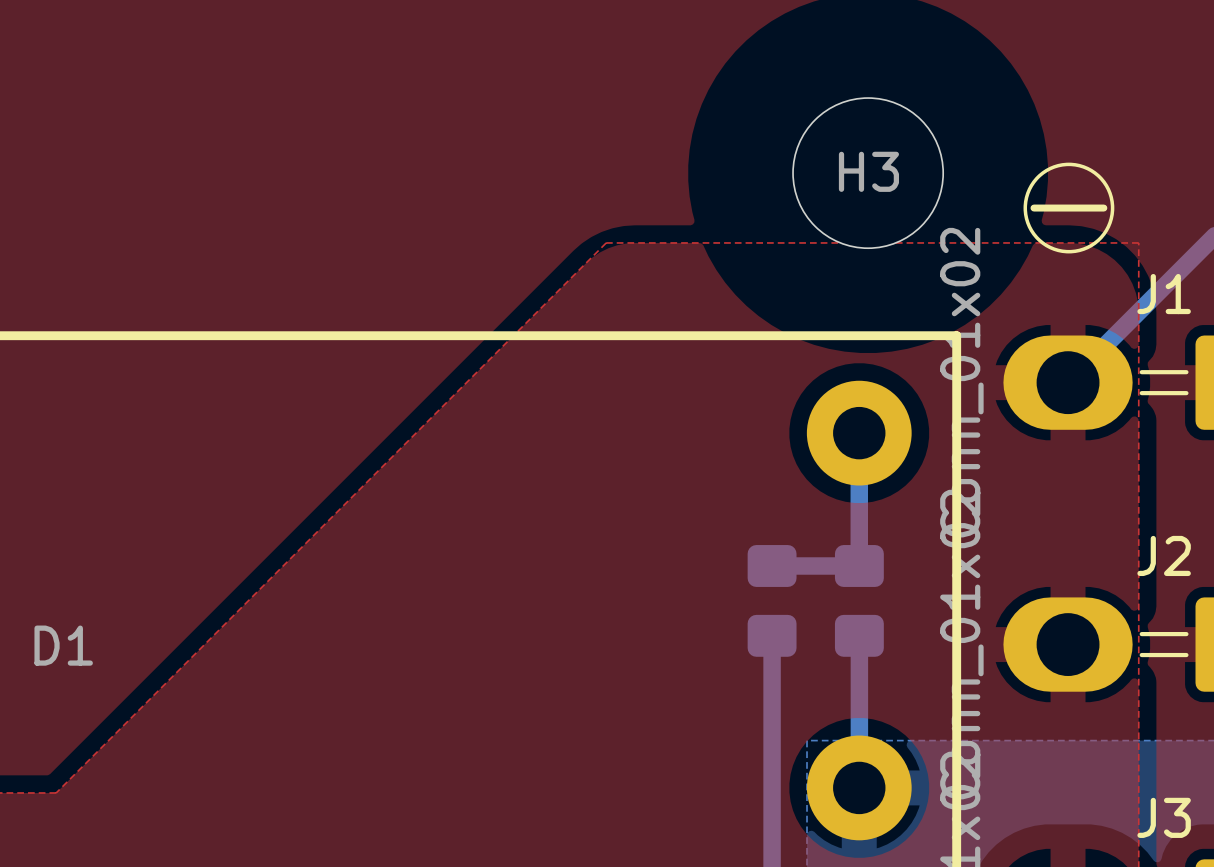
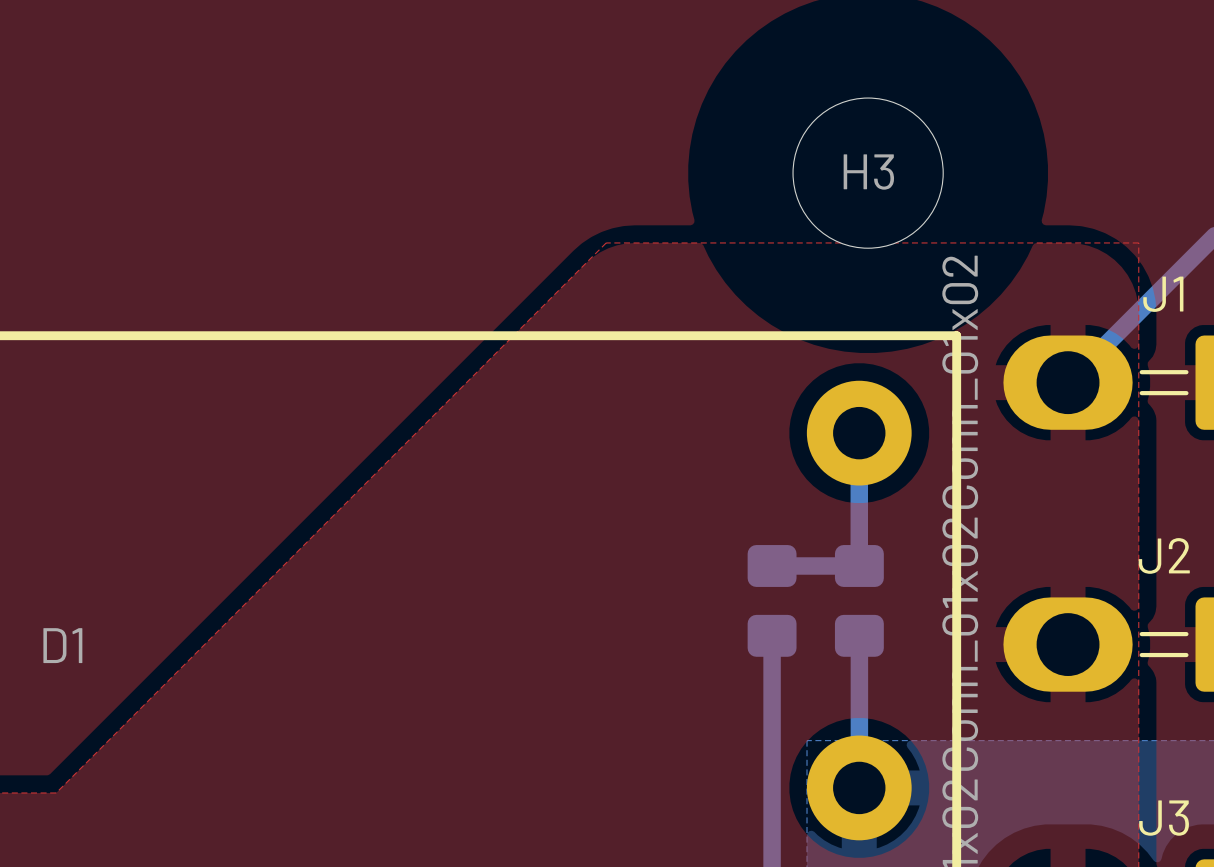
drawing: [1023, 162, 1115, 254] -> none
line: (1033, 208) (1103, 208) -> none

